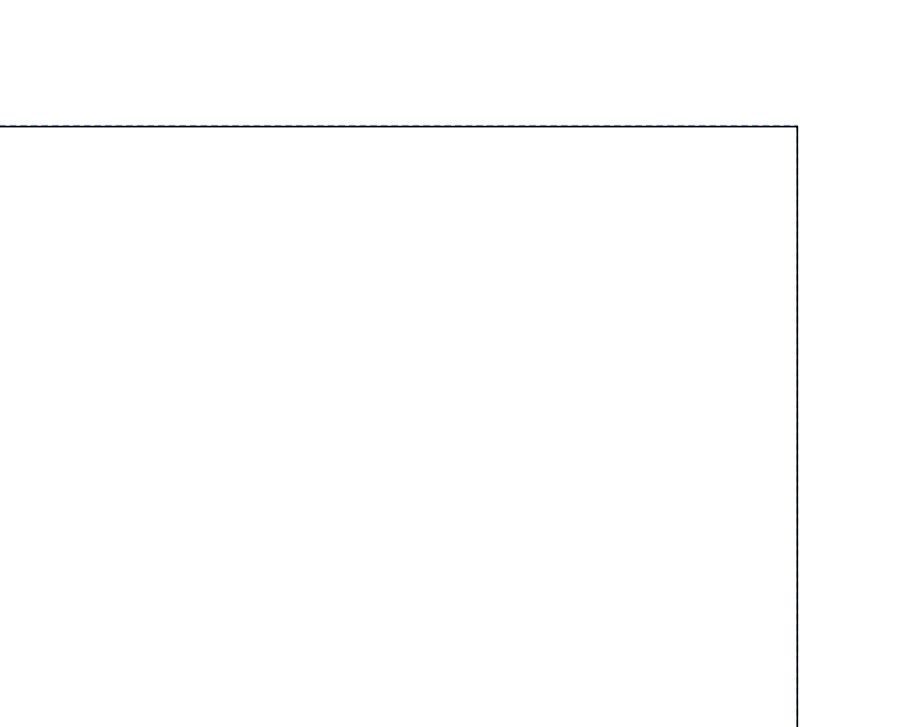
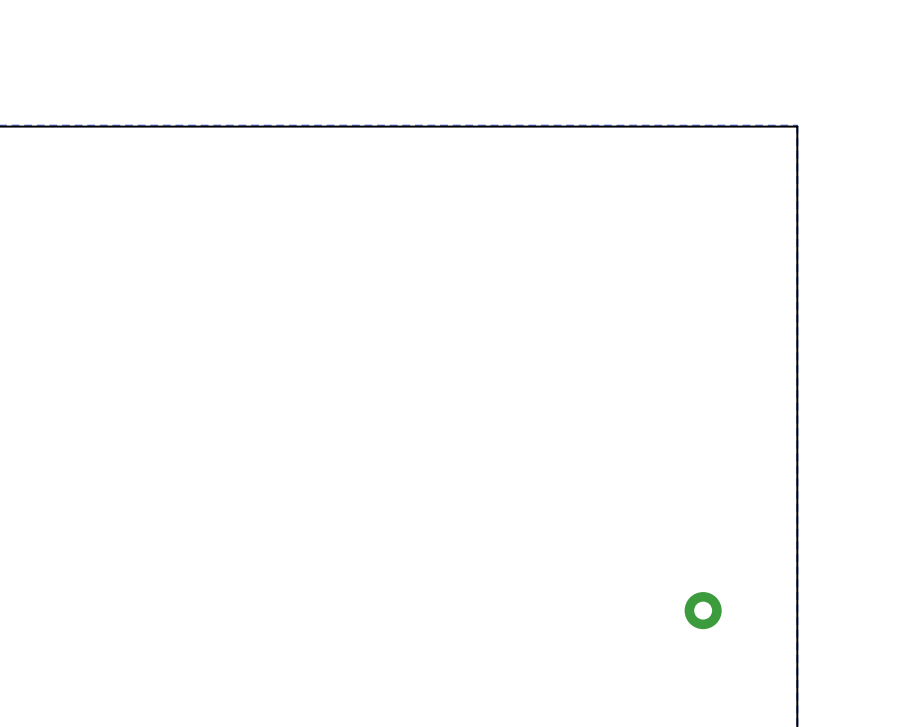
via: none -> (703, 610)

